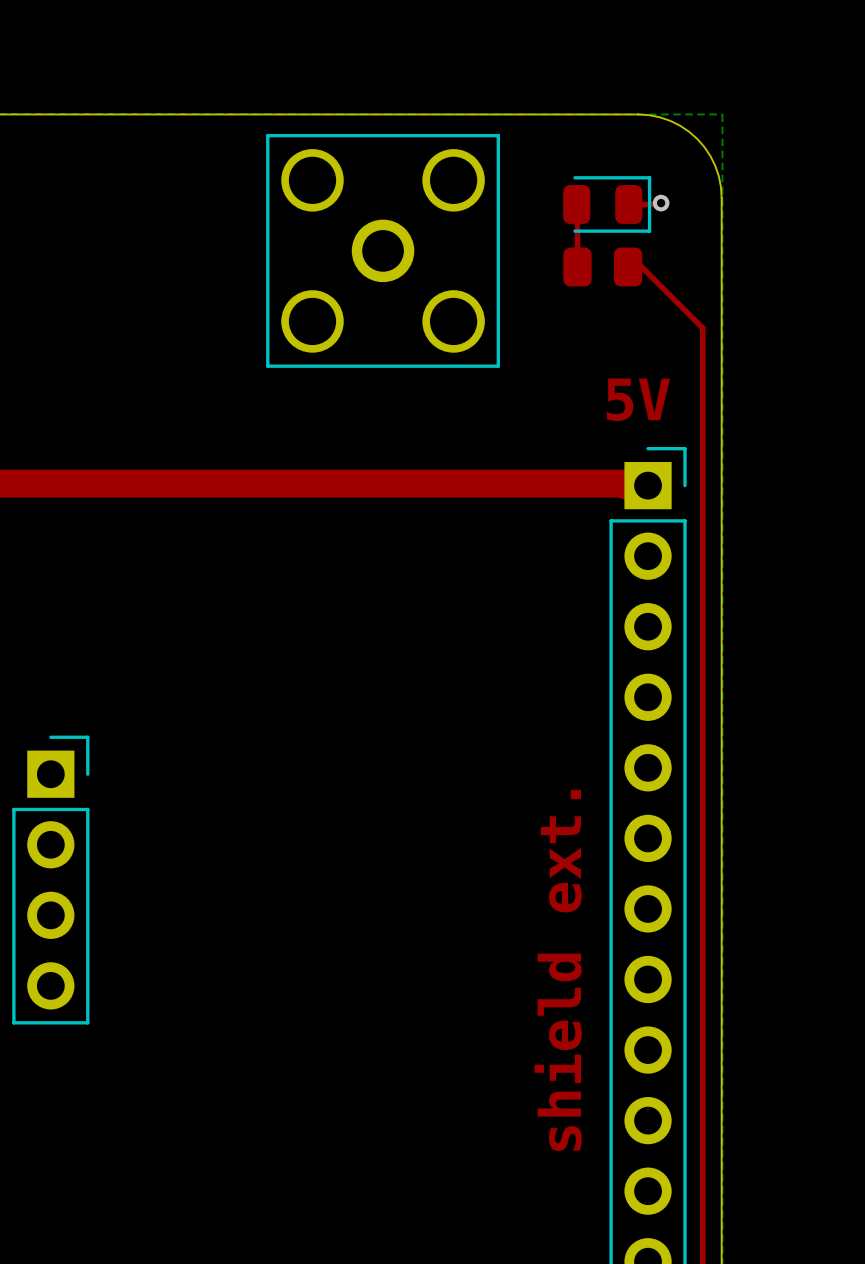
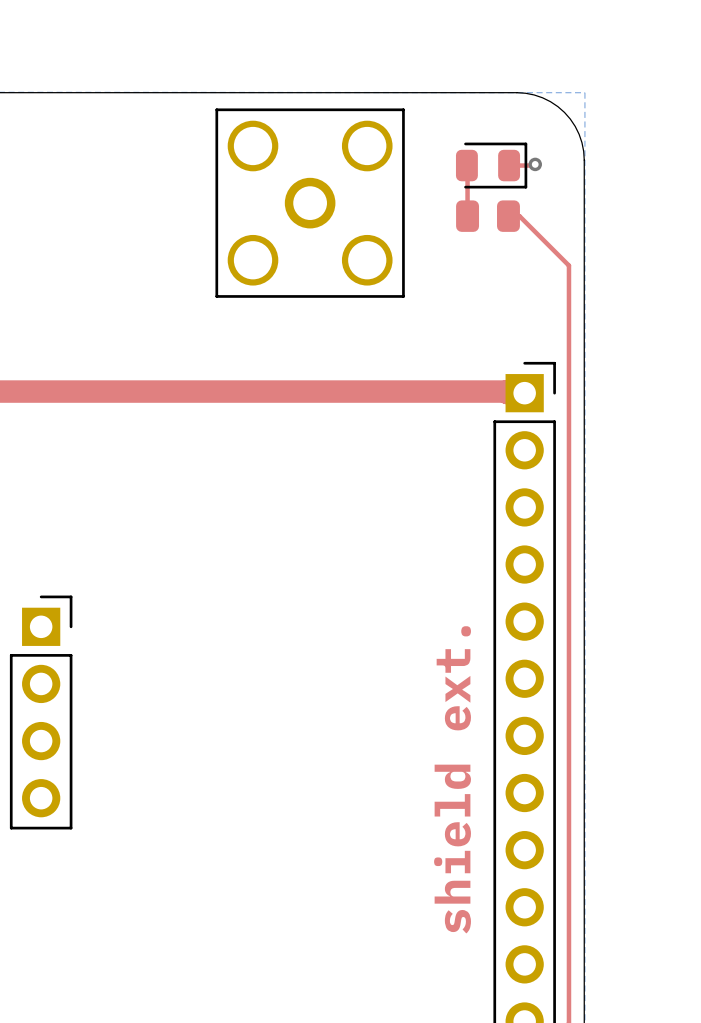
text: 5V (638, 399) -> none

